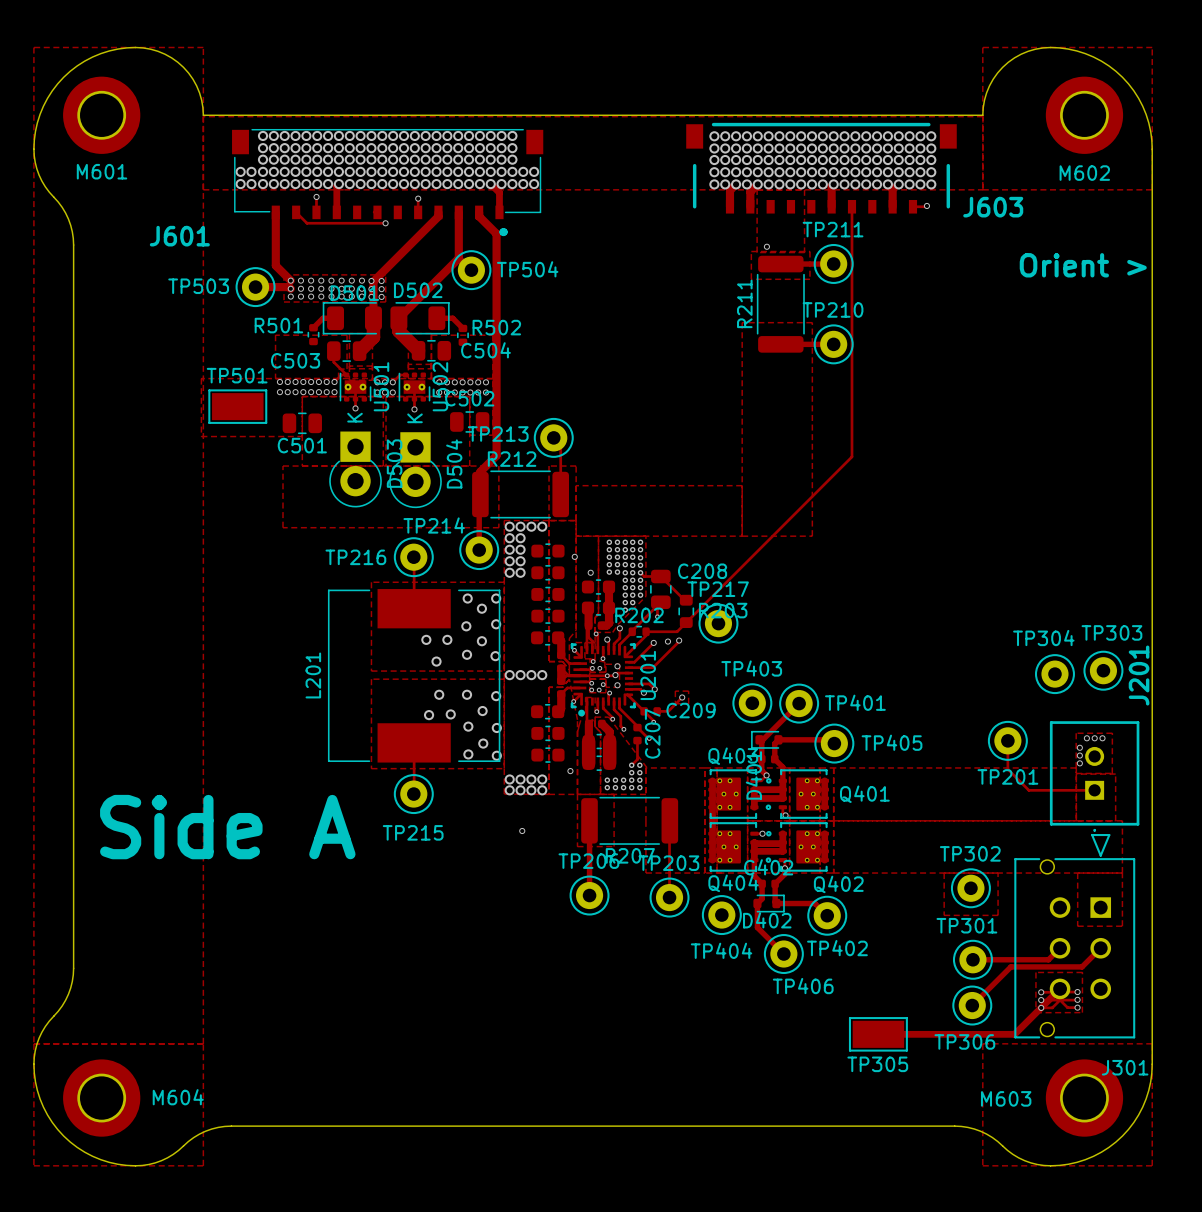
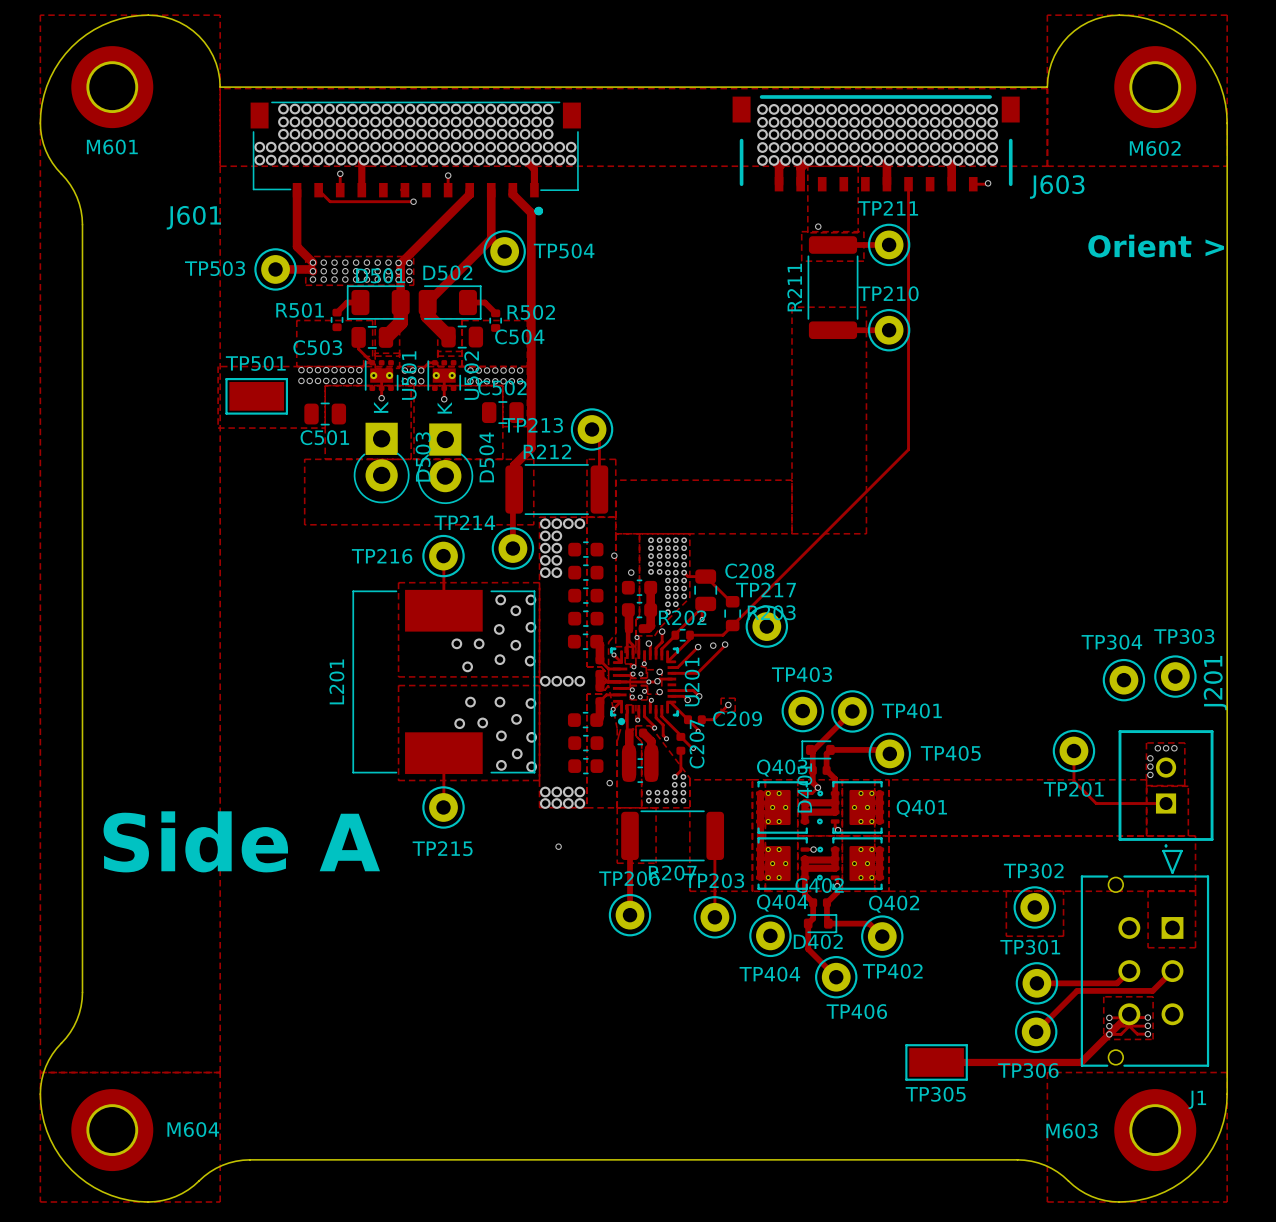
J301 name: J301 (1125, 1067) -> J1 (1197, 1099)

